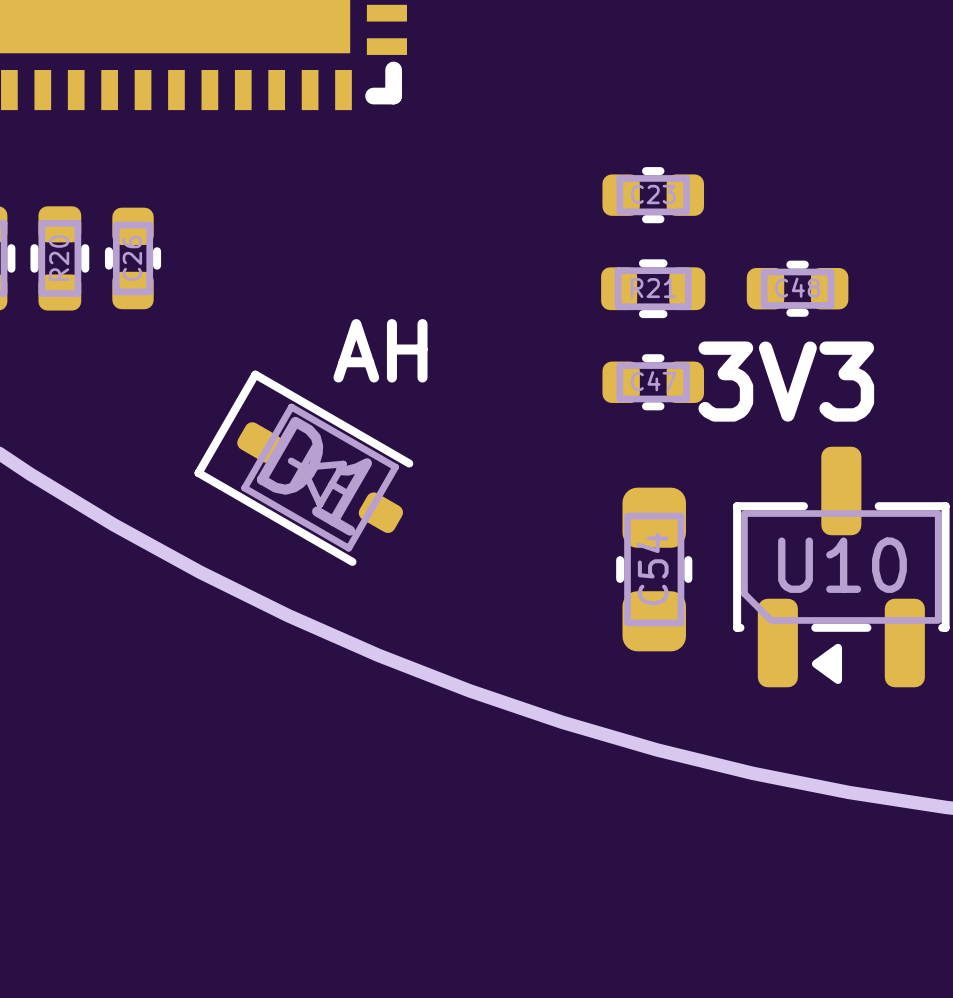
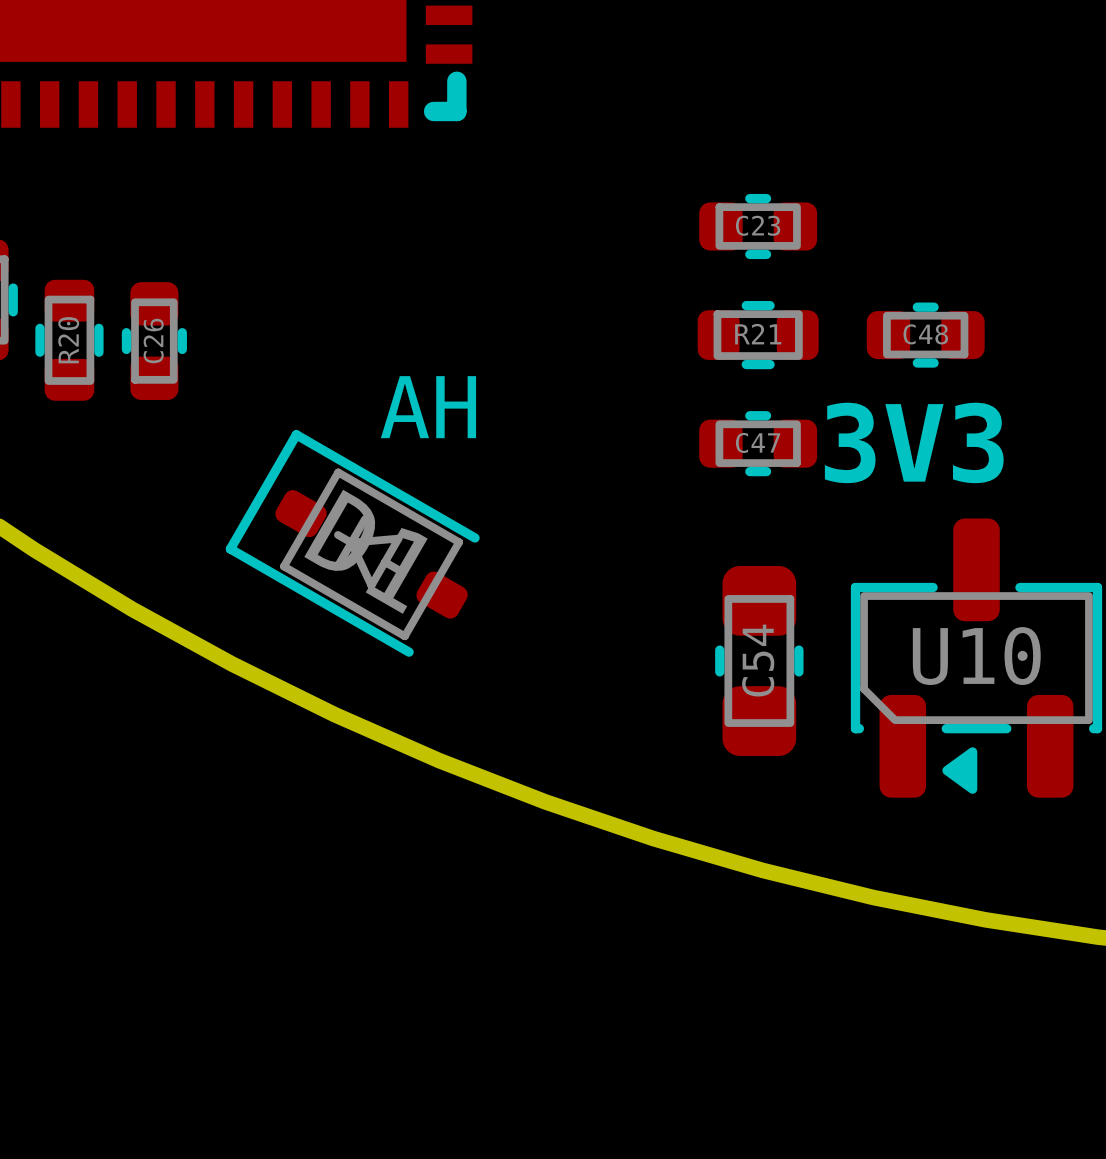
R20 position: (59, 258) -> (69, 340)
C26 position: (133, 258) -> (154, 341)

